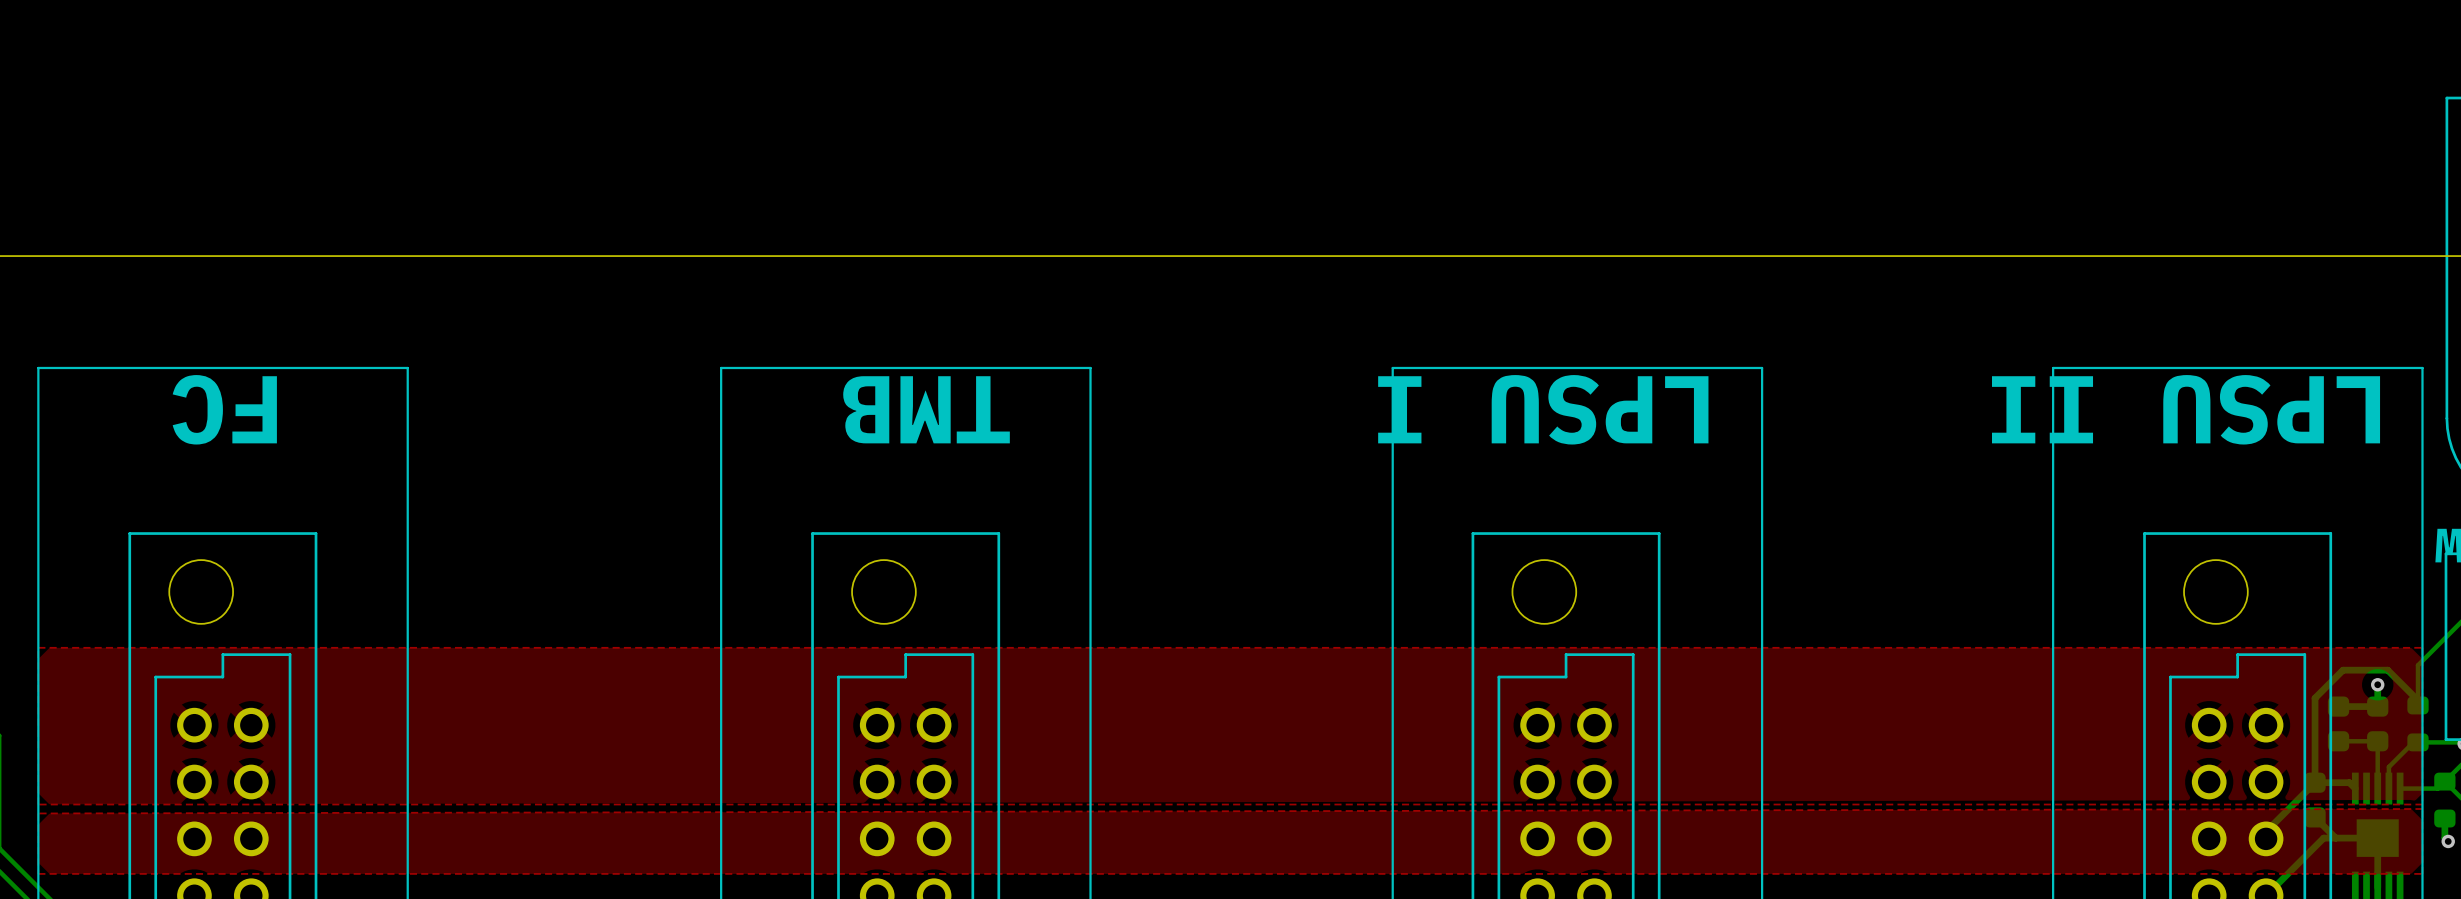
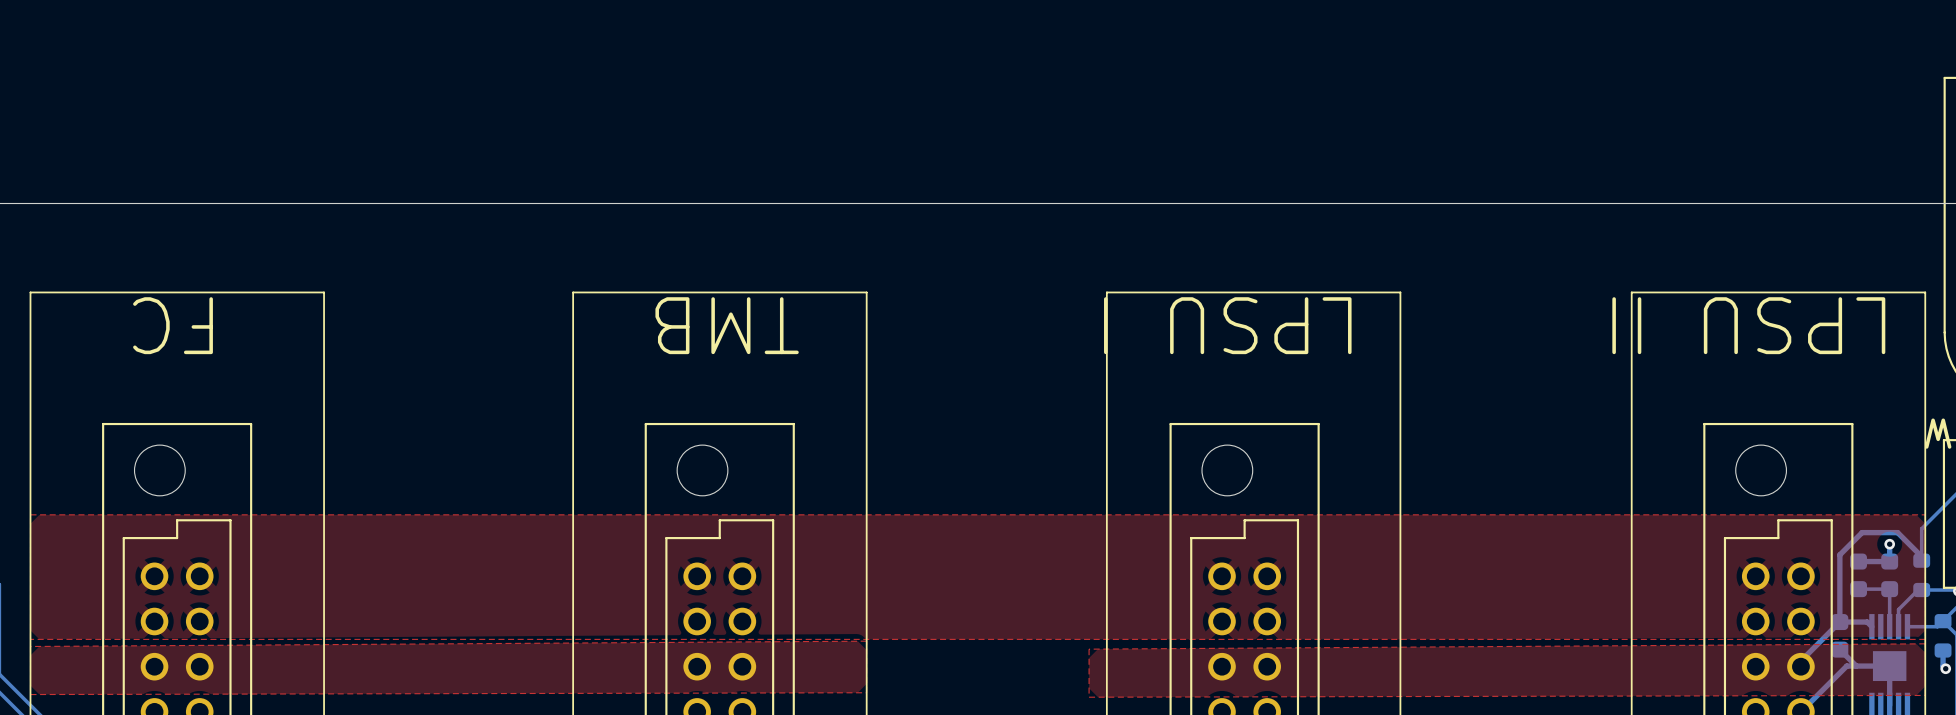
top zone outline: (2422, 810) (38, 813) -> (1925, 643) (1089, 649) (1089, 697) (1925, 694)
top zone outline: (38, 873) (2422, 873) -> (30, 694) (866, 692) (866, 641) (30, 646)

